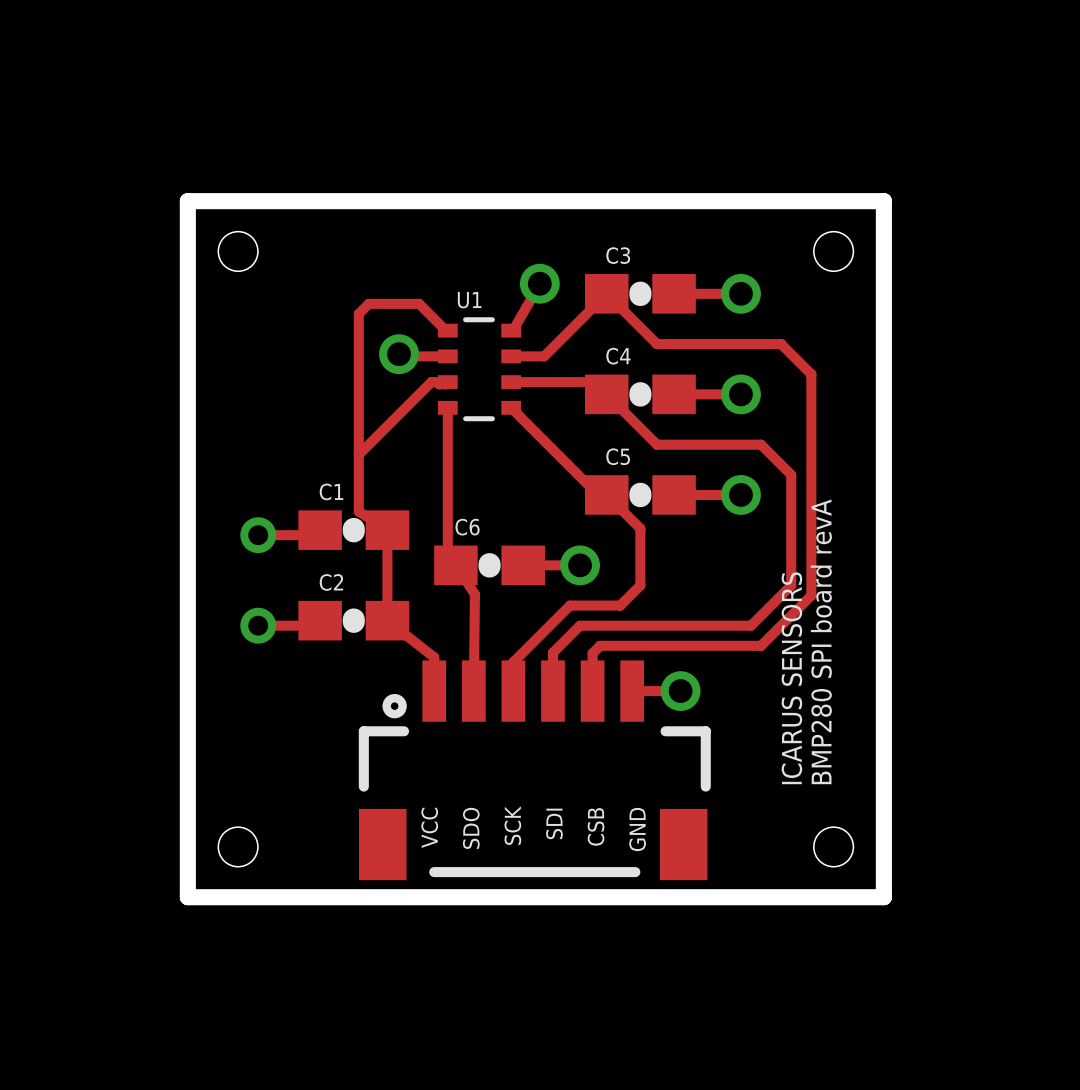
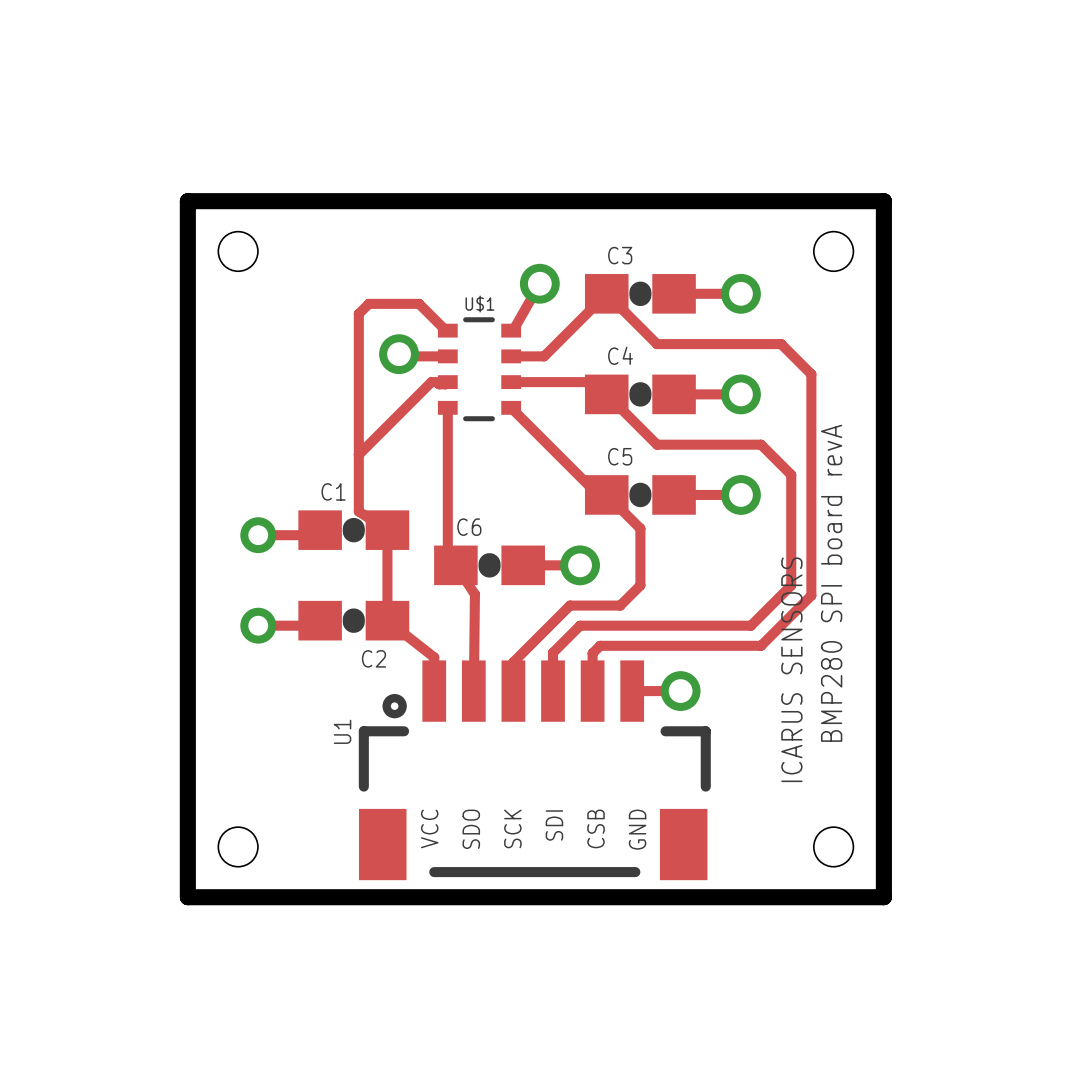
U1 name: U1 (469, 300) -> U$1 (479, 304)
C2 name position: C2 (331, 582) -> C2 (374, 658)
text position: BMP280 SPI board revA (821, 641) -> BMP280 SPI board revA (831, 583)
U1 name: none -> U1 (342, 731)

